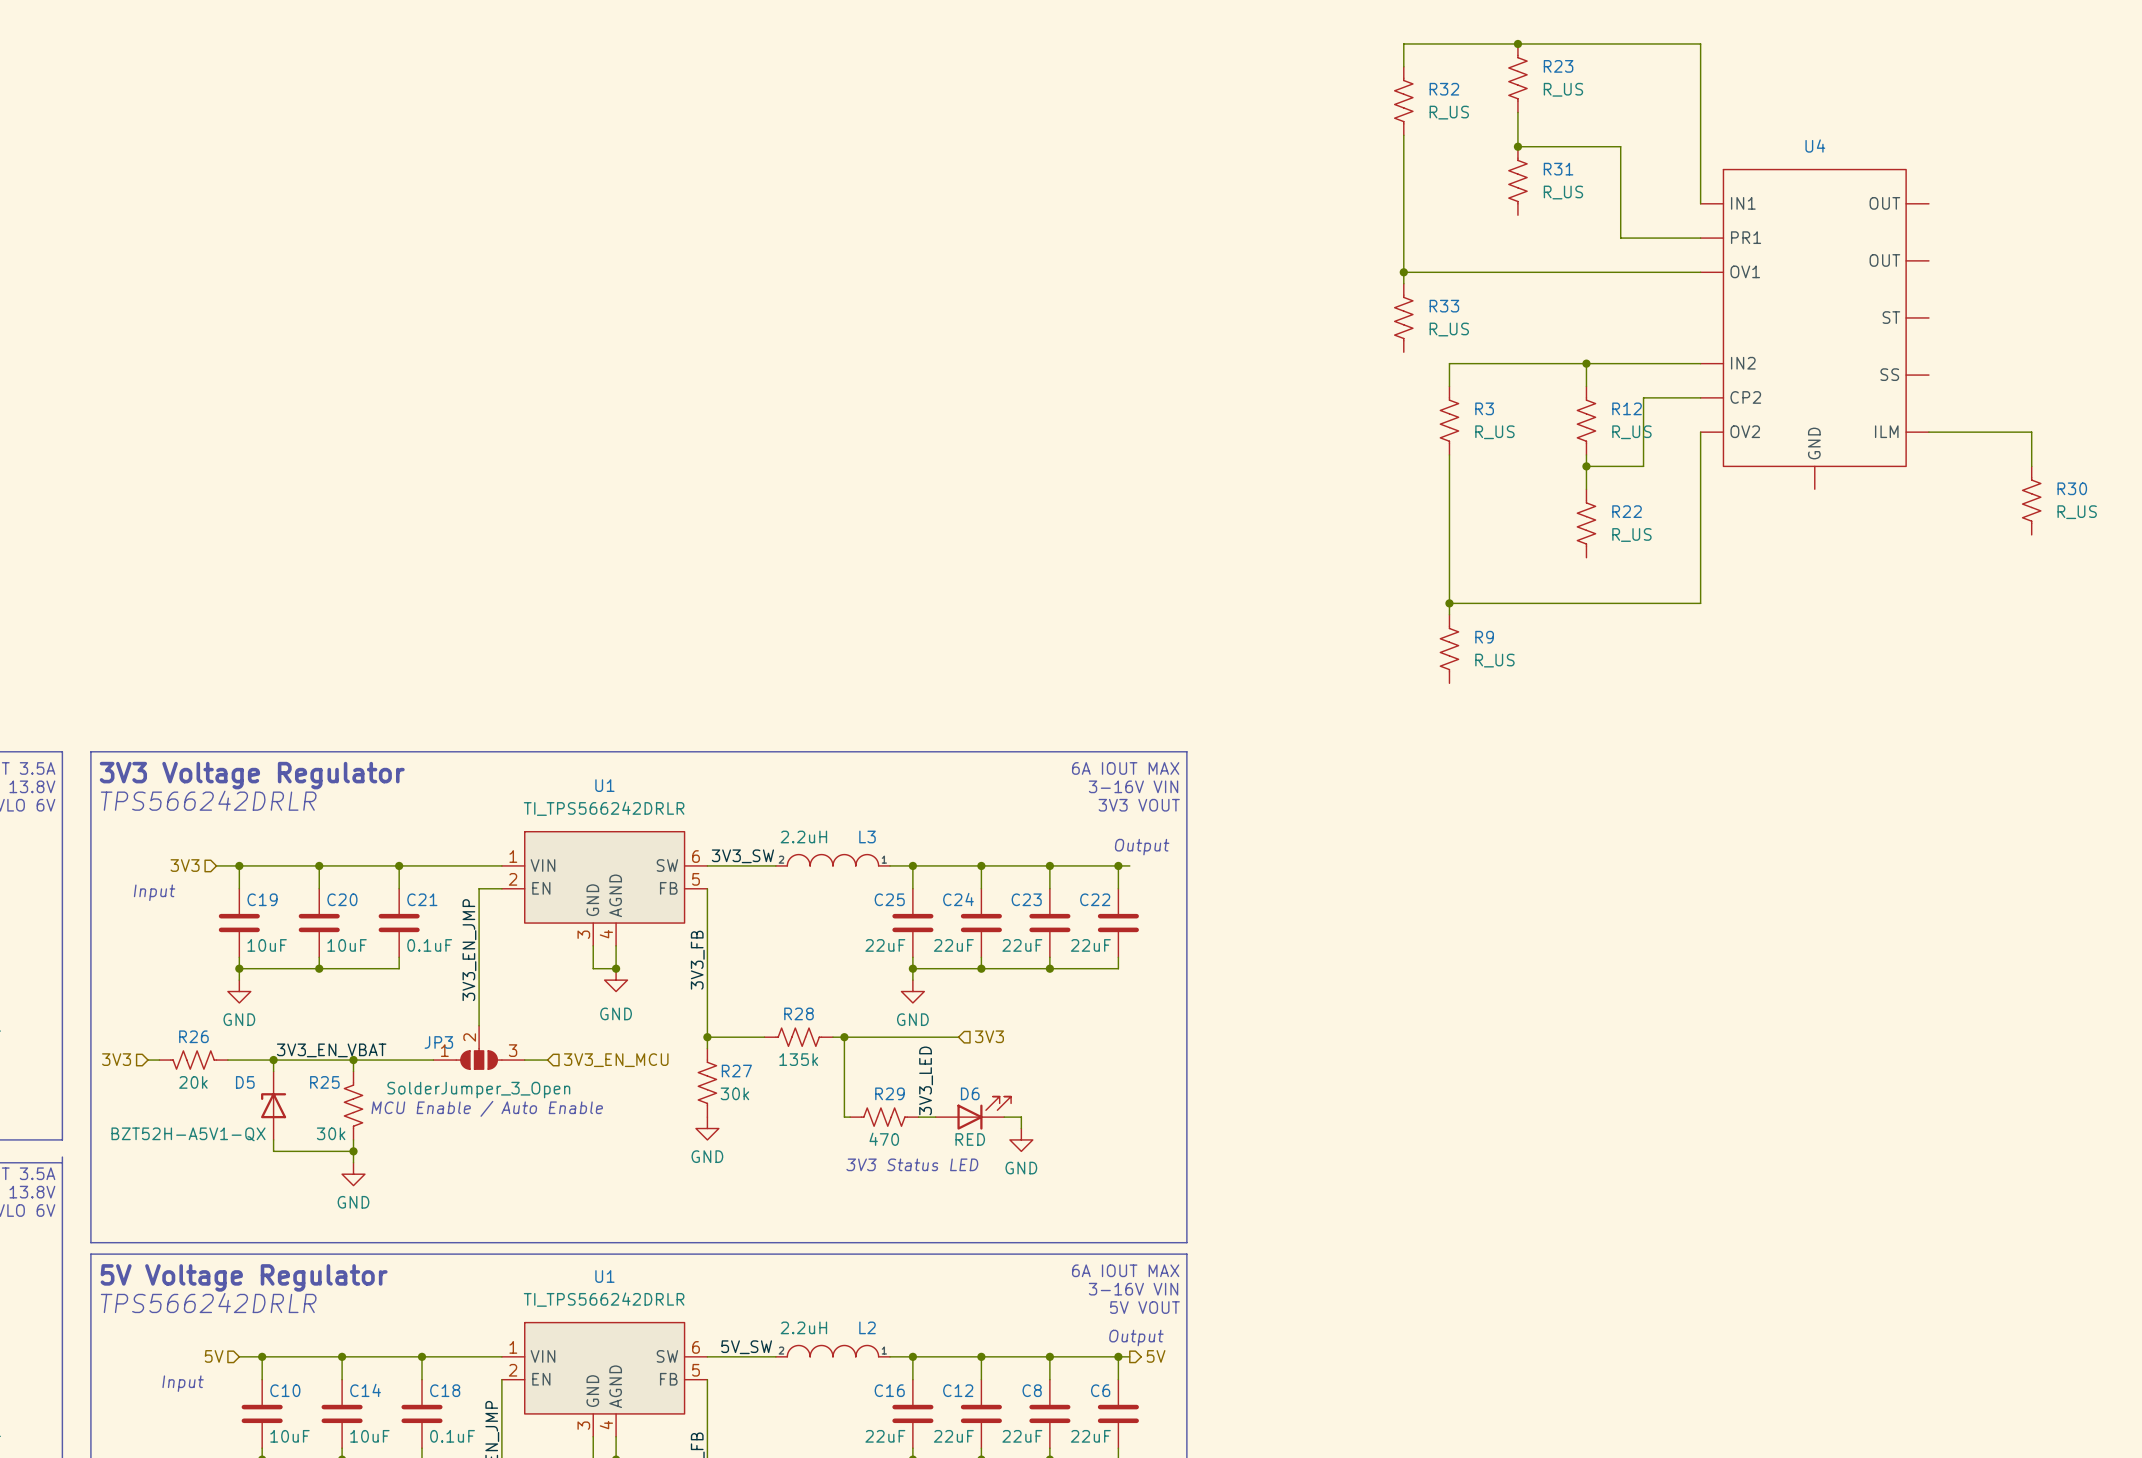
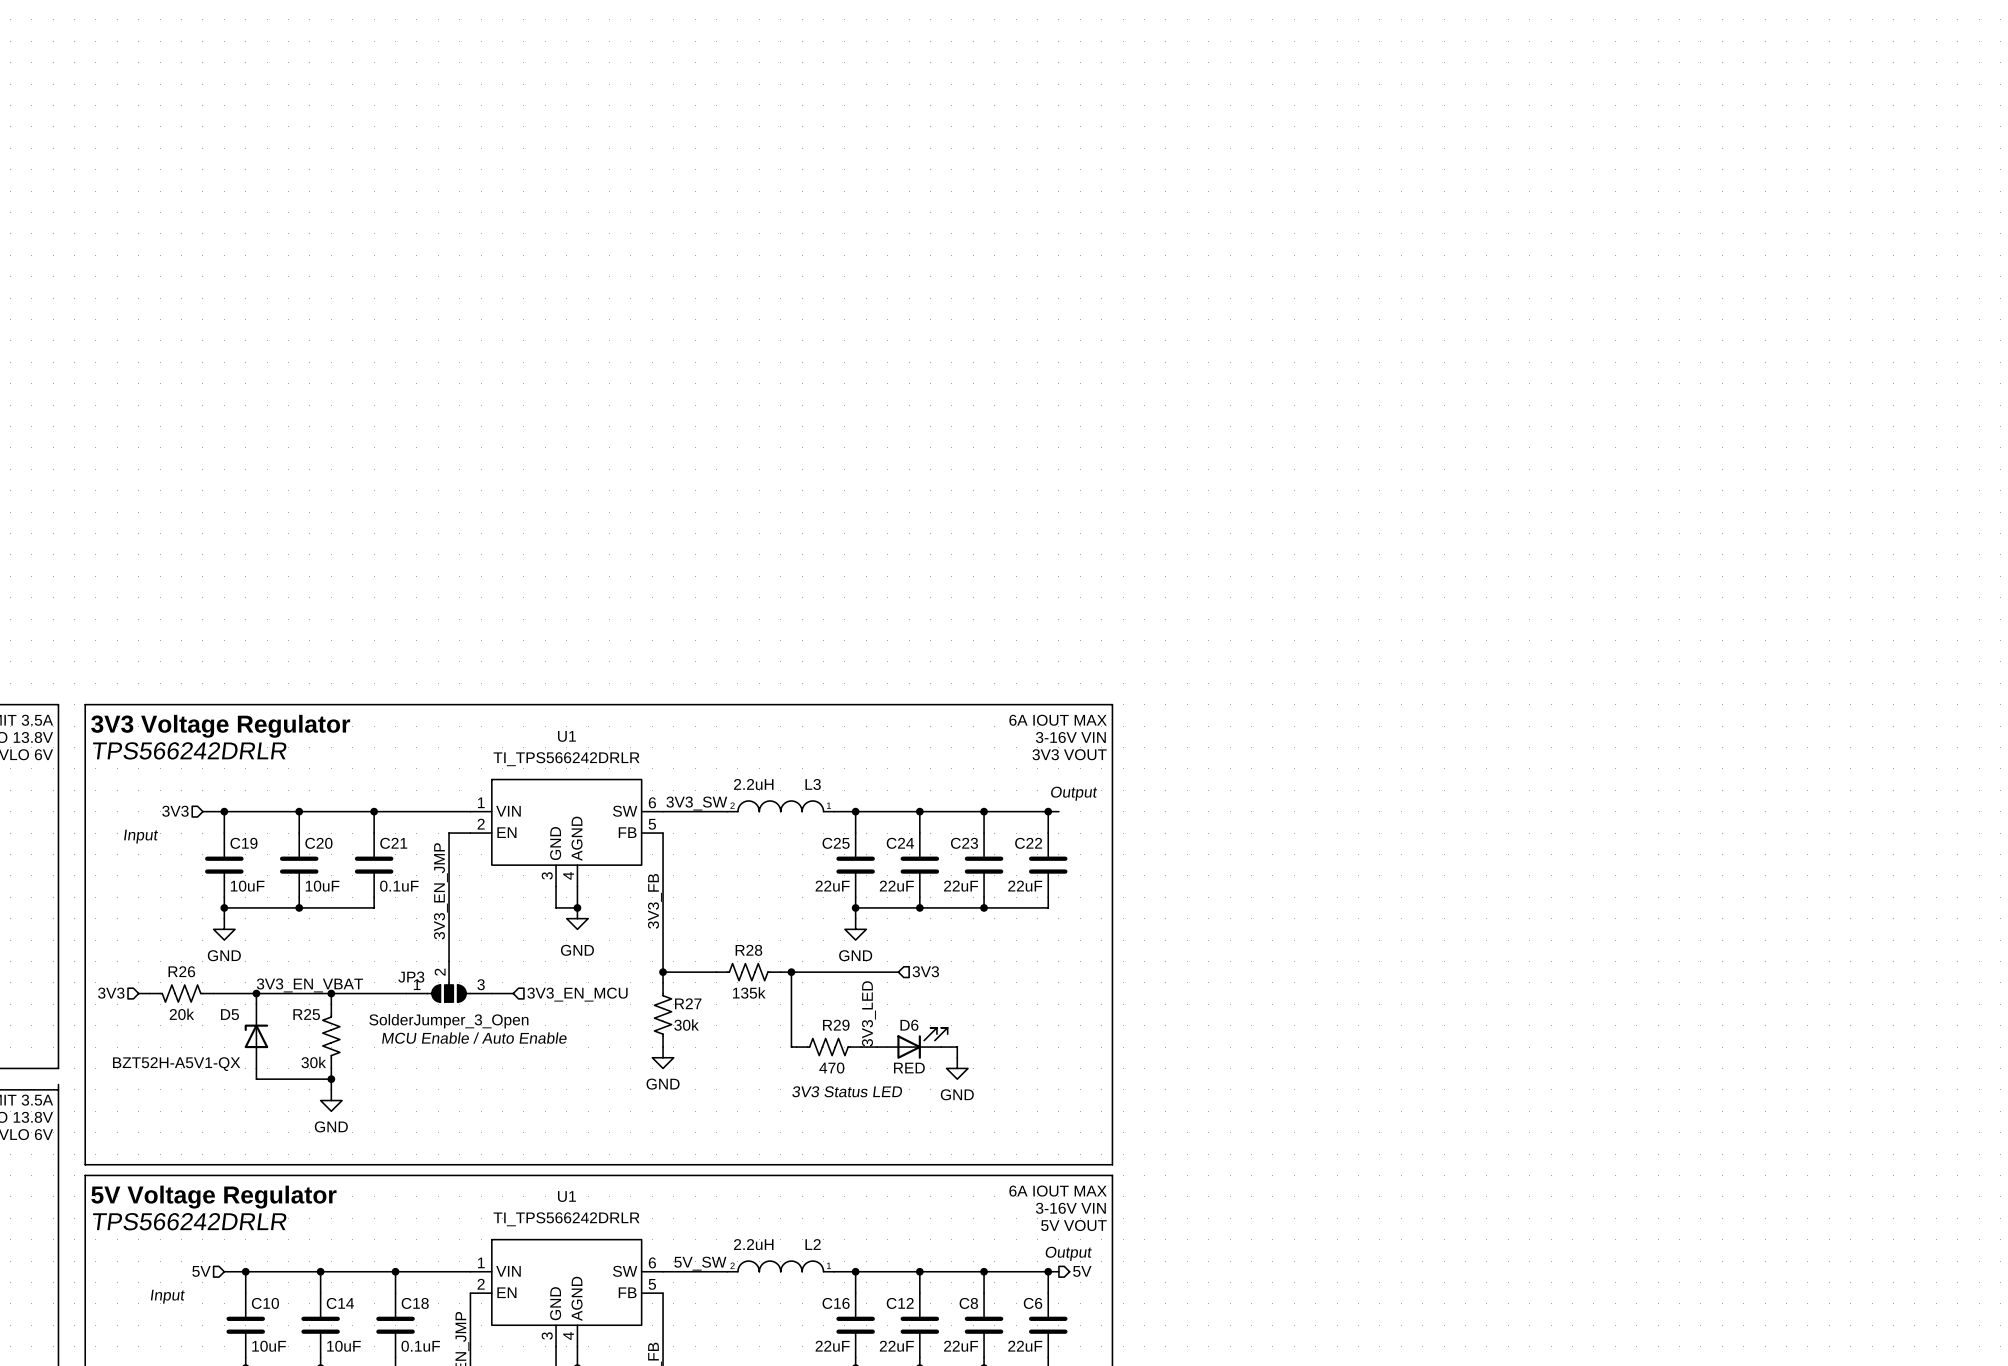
junction: (1517, 43) -> none
wire: (1403, 66) (1403, 43) (1700, 43) (1700, 203) -> none
R23: R_US (1517, 78) -> none
R32: R_US (1403, 101) -> none
wire: (1517, 112) (1517, 146) (1620, 146) (1620, 238) (1700, 238) -> none
wire: (1403, 135) (1403, 283) -> none
junction: (1517, 146) -> none
R31: R_US (1517, 180) -> none
wire: (1403, 272) (1700, 272) -> none
junction: (1403, 272) -> none
R33: R_US (1403, 317) -> none
U4: (1814, 329) -> none
wire: (1586, 363) (1586, 386) -> none
junction: (1586, 363) -> none
wire: (1700, 363) (1449, 363) (1449, 386) -> none
wire: (1700, 397) (1643, 397) (1643, 466) (1586, 466) -> none
R3: R_US (1449, 420) -> none
R12: R_US (1586, 420) -> none
wire: (1700, 432) (1700, 603) (1449, 603) -> none
wire: (1928, 432) (2031, 432) (2031, 466) -> none
wire: (1449, 454) (1449, 614) -> none
wire: (1586, 454) (1586, 489) -> none
junction: (1586, 466) -> none
R30: R_US (2031, 500) -> none
R22: R_US (1586, 523) -> none
junction: (1449, 603) -> none
R9: R_US (1449, 649) -> none

